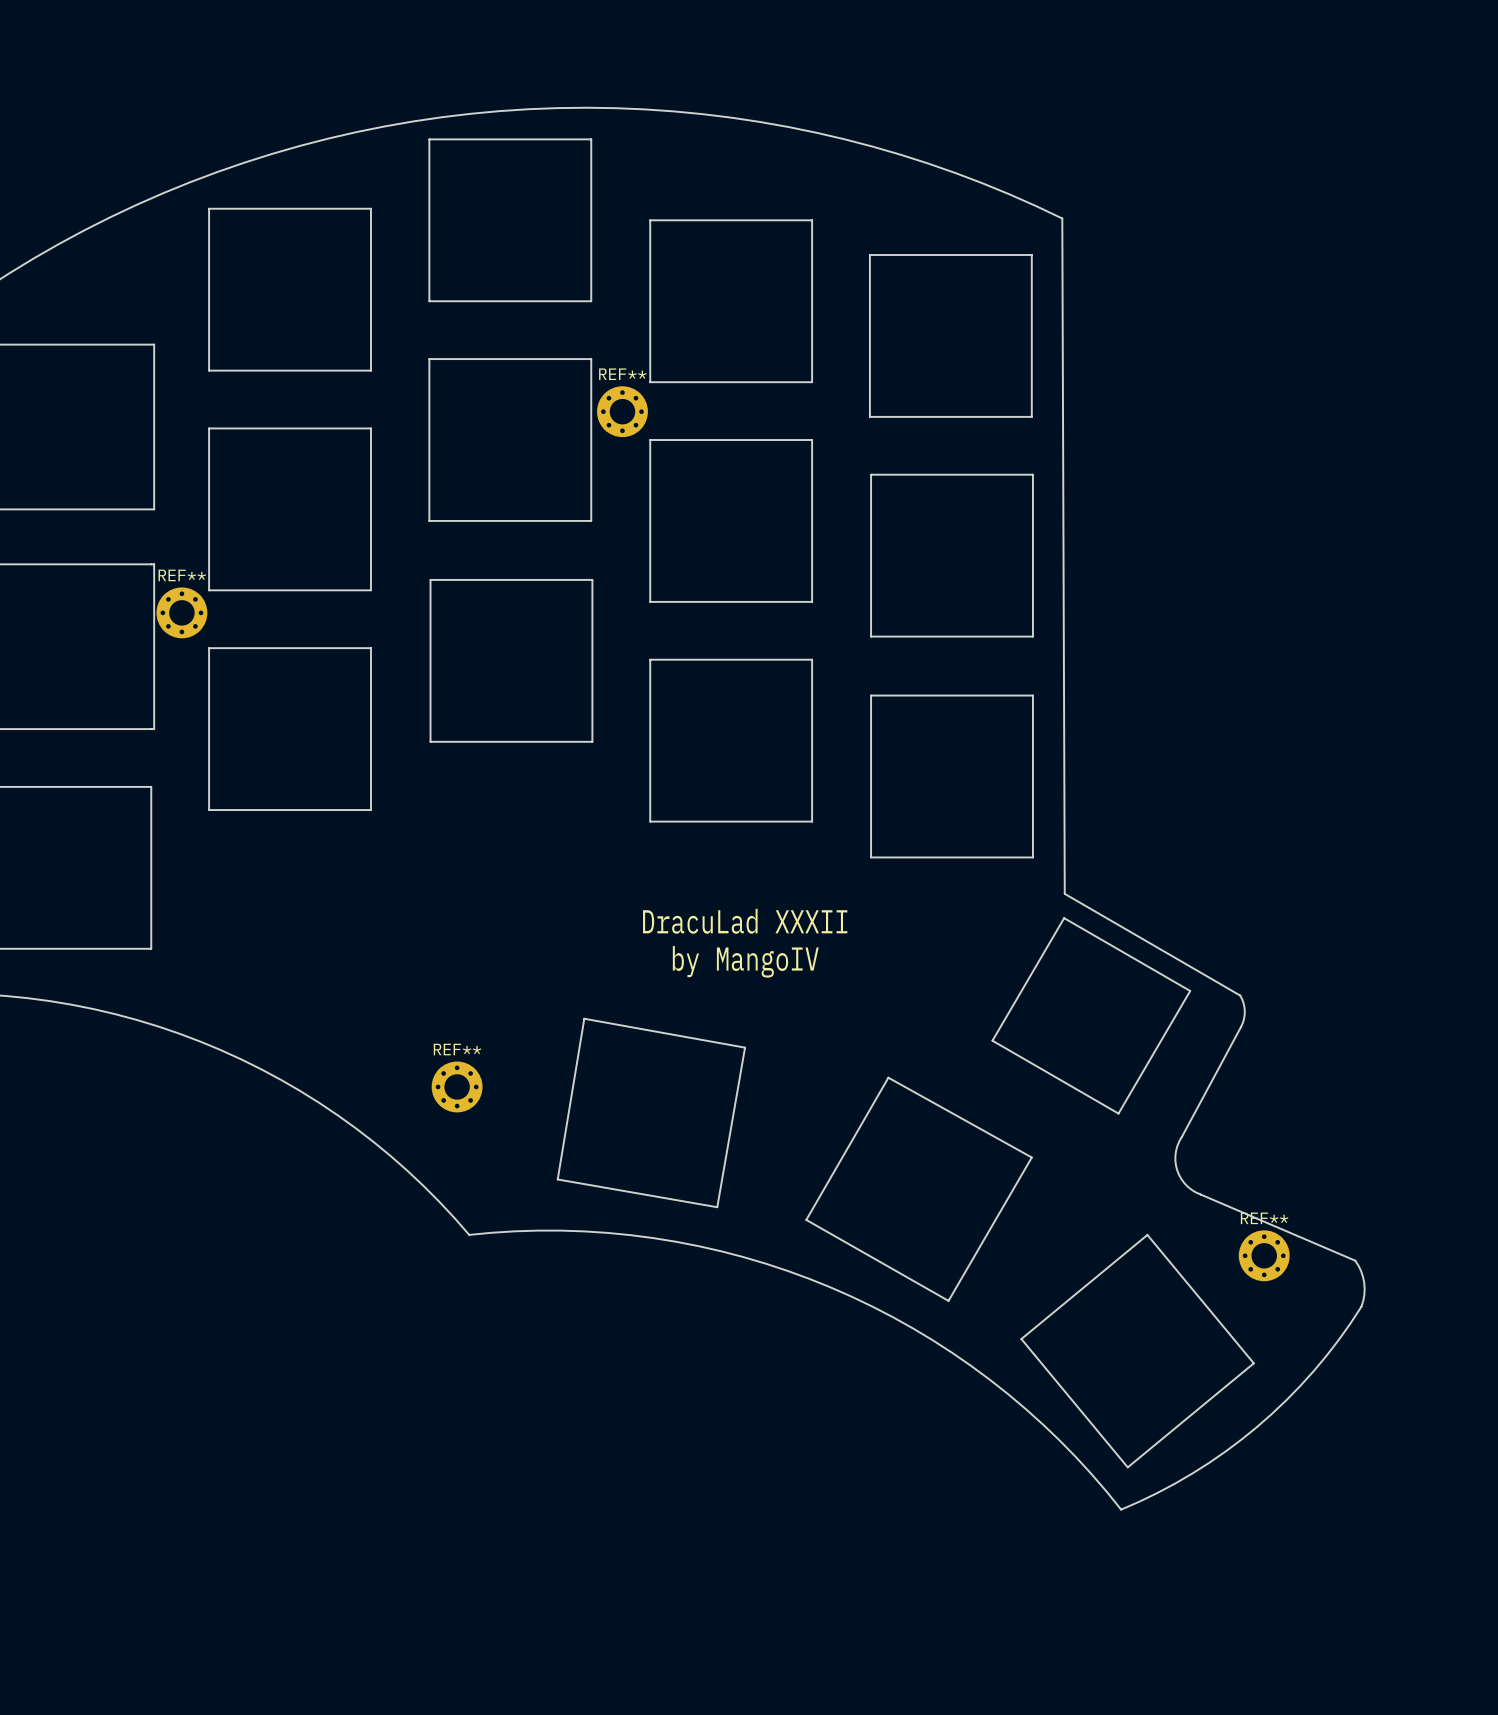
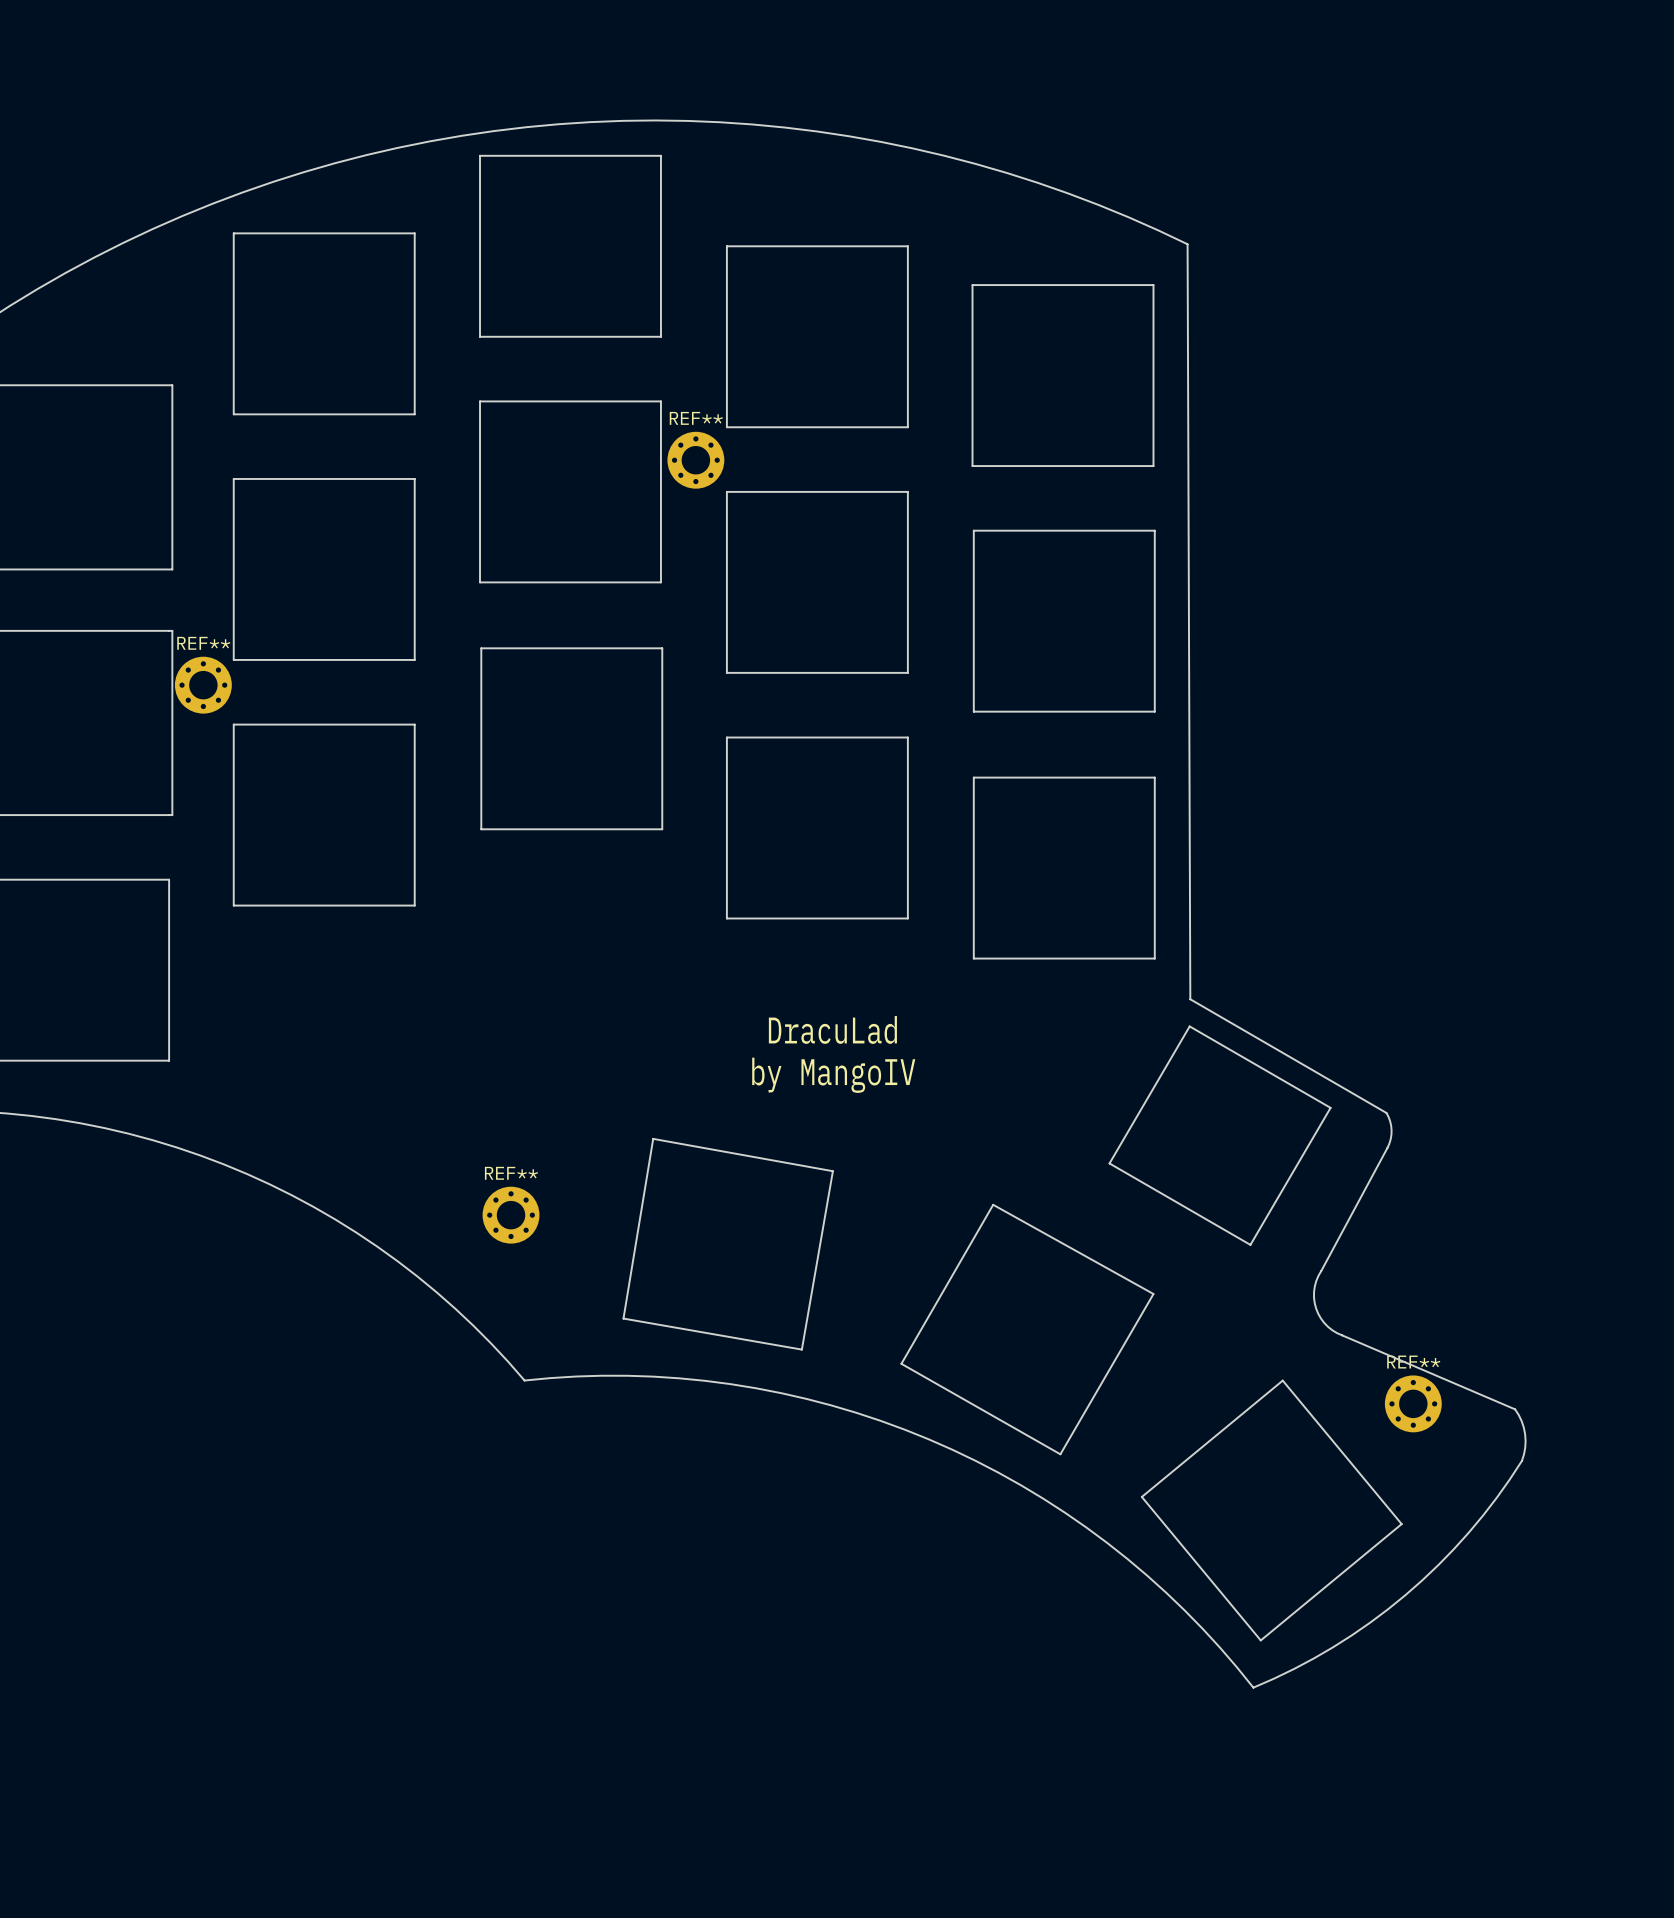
text: DracuLad XXXII (745, 921) -> DracuLad (832, 1029)

